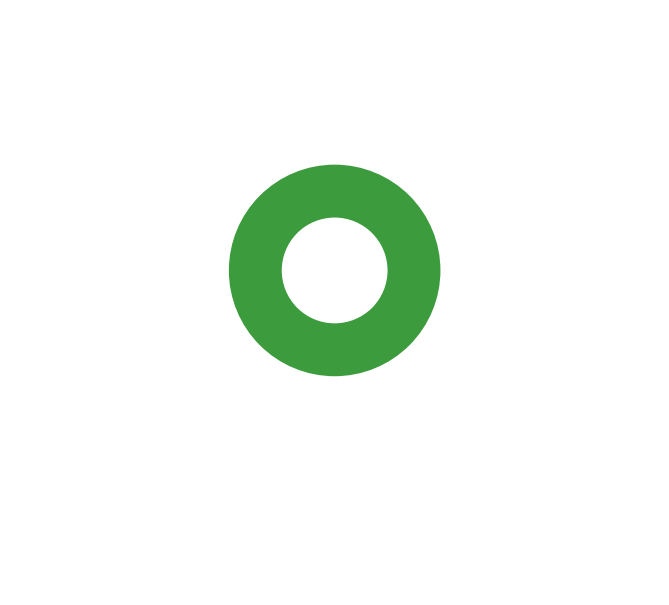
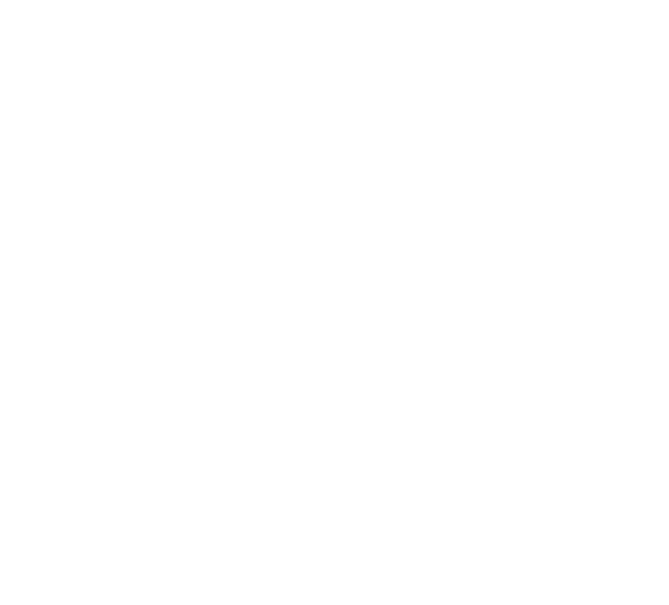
part: (334, 270) -> none

